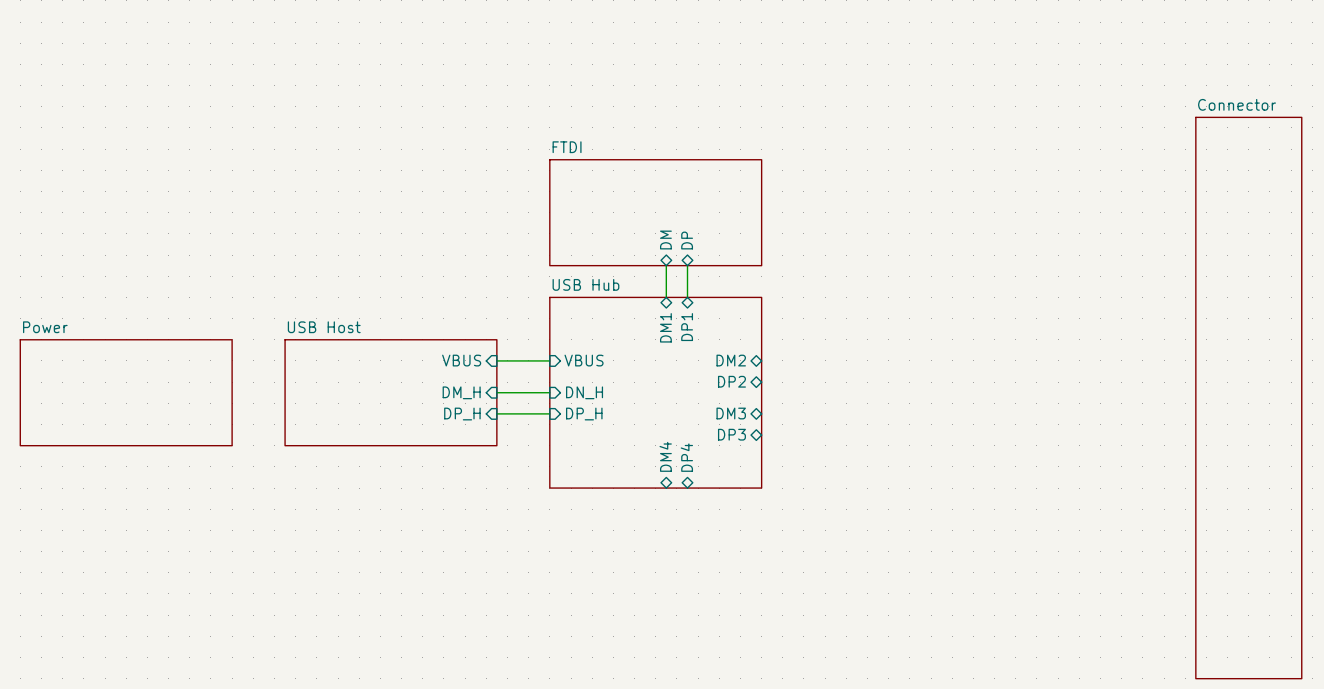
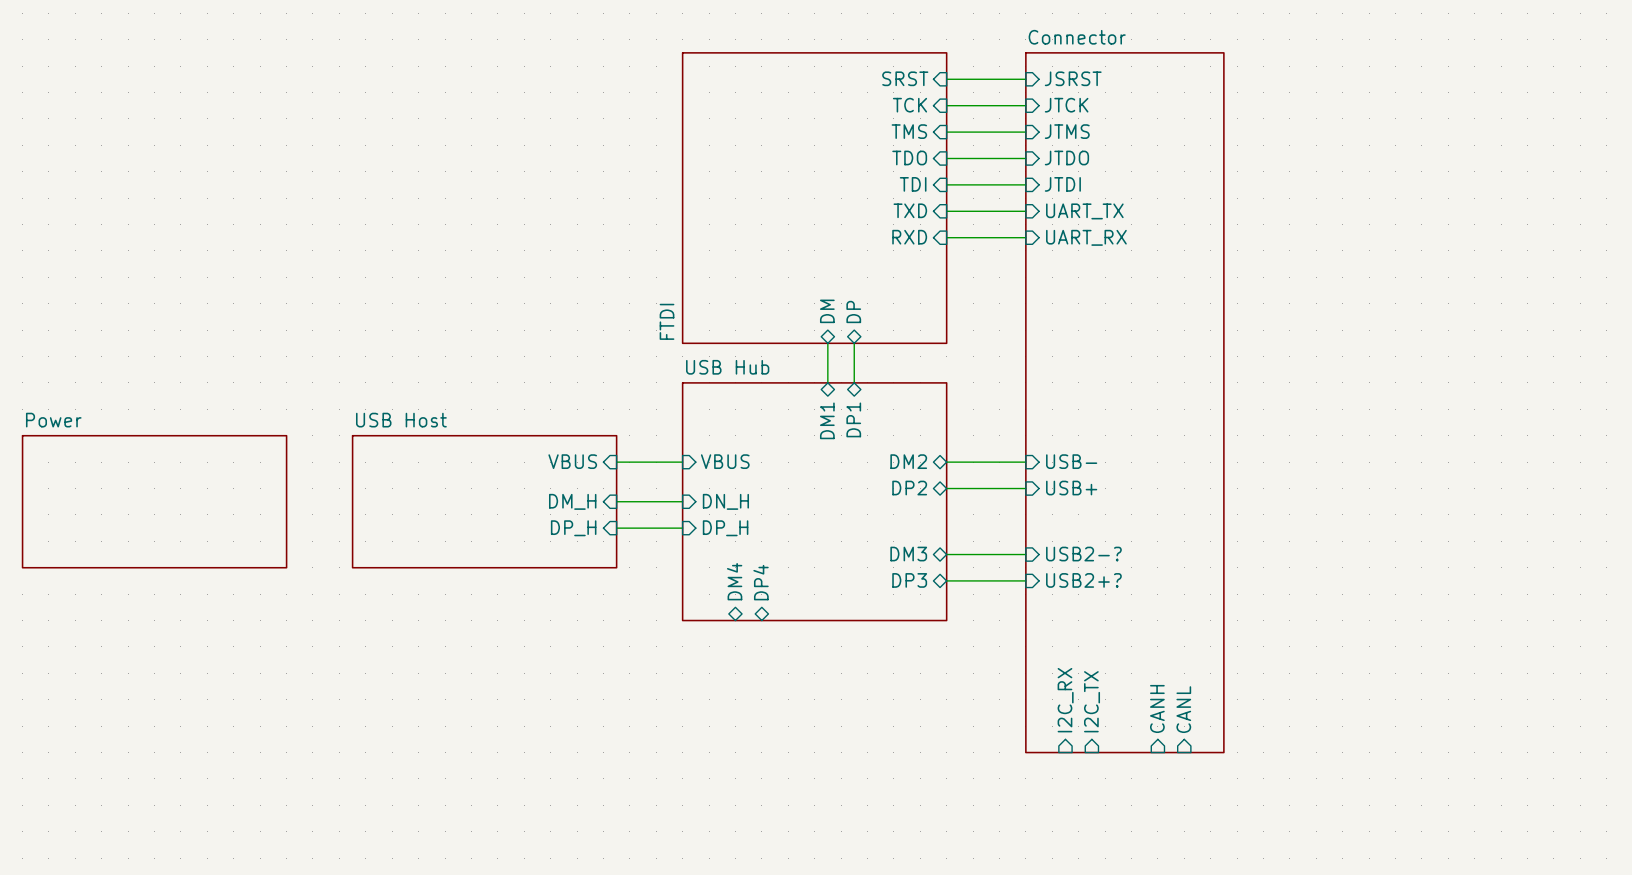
sheet pin: none -> SRST (905, 78)
wire: none -> (946, 79) (1025, 79)
sheet pin: none -> JSRST (1073, 78)
sheet pin: none -> TCK (909, 105)
sheet pin: none -> JTCK (1066, 105)
wire: none -> (946, 105) (1025, 105)
sheet pin: none -> TMS (909, 131)
sheet pin: none -> JTMS (1067, 131)
wire: none -> (946, 132) (1025, 132)
sheet pin: none -> TDO (909, 157)
sheet pin: none -> JTDO (1066, 157)
wire: none -> (946, 158) (1025, 158)
sheet pin: none -> TDI (913, 184)
wire: none -> (946, 184) (1025, 184)
sheet pin: none -> JTDI (1062, 184)
sheet FTDI: none -> (814, 198)
sheet pin: none -> TXD (910, 210)
wire: none -> (946, 211) (1025, 211)
sheet pin: none -> UART_TX (1084, 211)
sheet pin: none -> RXD (909, 237)
wire: none -> (946, 237) (1025, 237)
sheet pin: none -> UART_RX (1086, 237)
sheet FTDI: (655, 212) -> none
sheet Connector: none -> (1124, 402)
wire: none -> (946, 462) (1025, 462)
sheet pin: none -> USB- (1071, 461)
sheet pin: none -> USB+ (1071, 488)
wire: none -> (946, 488) (1025, 488)
sheet Connector: (1248, 398) -> none
sheet pin: DM3 (731, 413) -> none
sheet pin: DP3 (731, 434) -> DM3 (908, 554)
sheet pin: none -> USB2-? (1083, 554)
wire: none -> (946, 554) (1025, 554)
sheet pin: none -> DP3 (909, 580)
sheet pin: none -> USB2+? (1083, 580)
sheet pin position: DM4 (665, 456) -> DM4 (734, 581)
wire: none -> (946, 580) (1025, 580)
sheet pin position: DP4 (686, 457) -> DP4 (761, 582)
sheet pin: none -> I2C_RX (1065, 700)
sheet pin: none -> I2C_TX (1092, 701)
sheet pin: none -> CANH (1157, 708)
sheet pin: none -> CANL (1183, 709)

